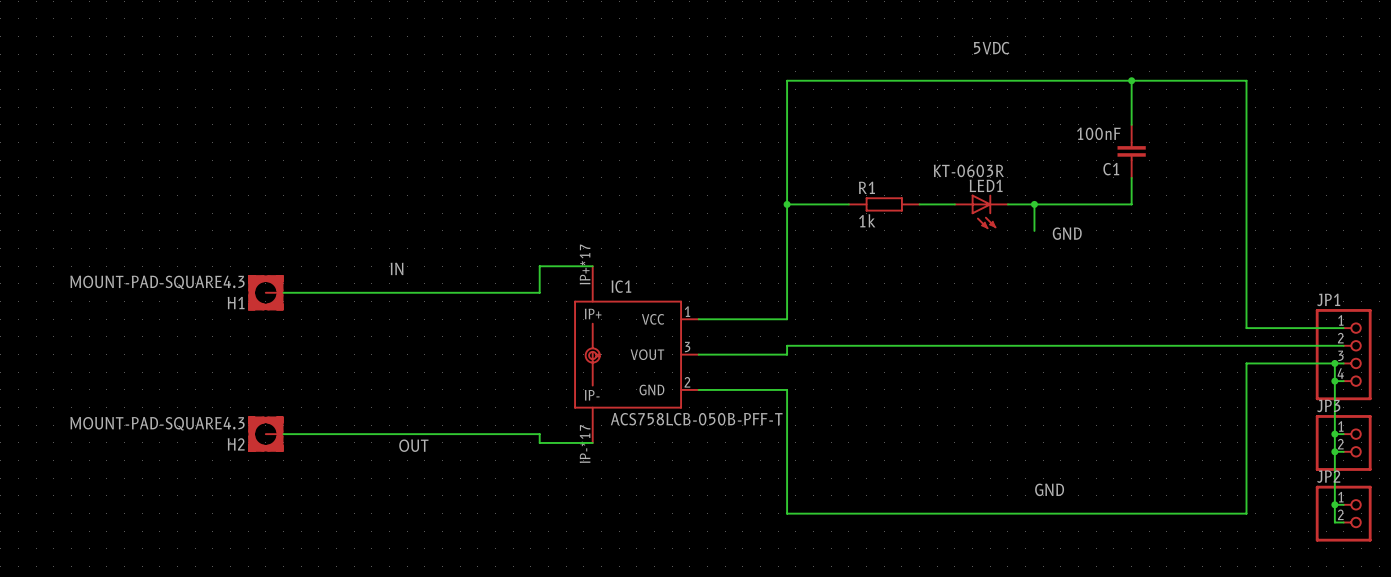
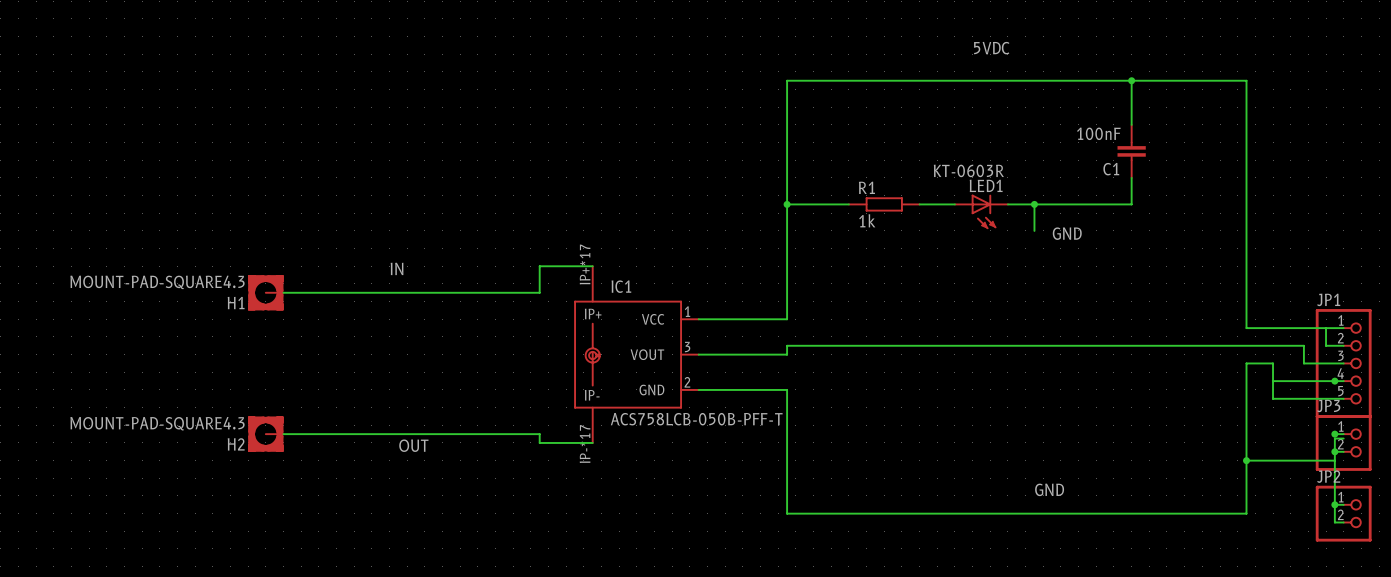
JP1 symbol: [1315, 309, 1372, 401] -> [1315, 309, 1372, 418]
wire: none -> (1326, 328) (1326, 345)
wire: (1303, 345) (1326, 345) -> (1303, 345) (1303, 363)
wire: (1273, 363) (1303, 363) -> (1273, 363) (1273, 398) (1343, 398)
wire: (1334, 363) (1334, 438) -> (1343, 438) (1334, 438)
junction: (1334, 363) -> none
wire: none -> (1273, 381) (1334, 381)
wire: none -> (1246, 460) (1334, 460)
junction: none -> (1246, 460)

